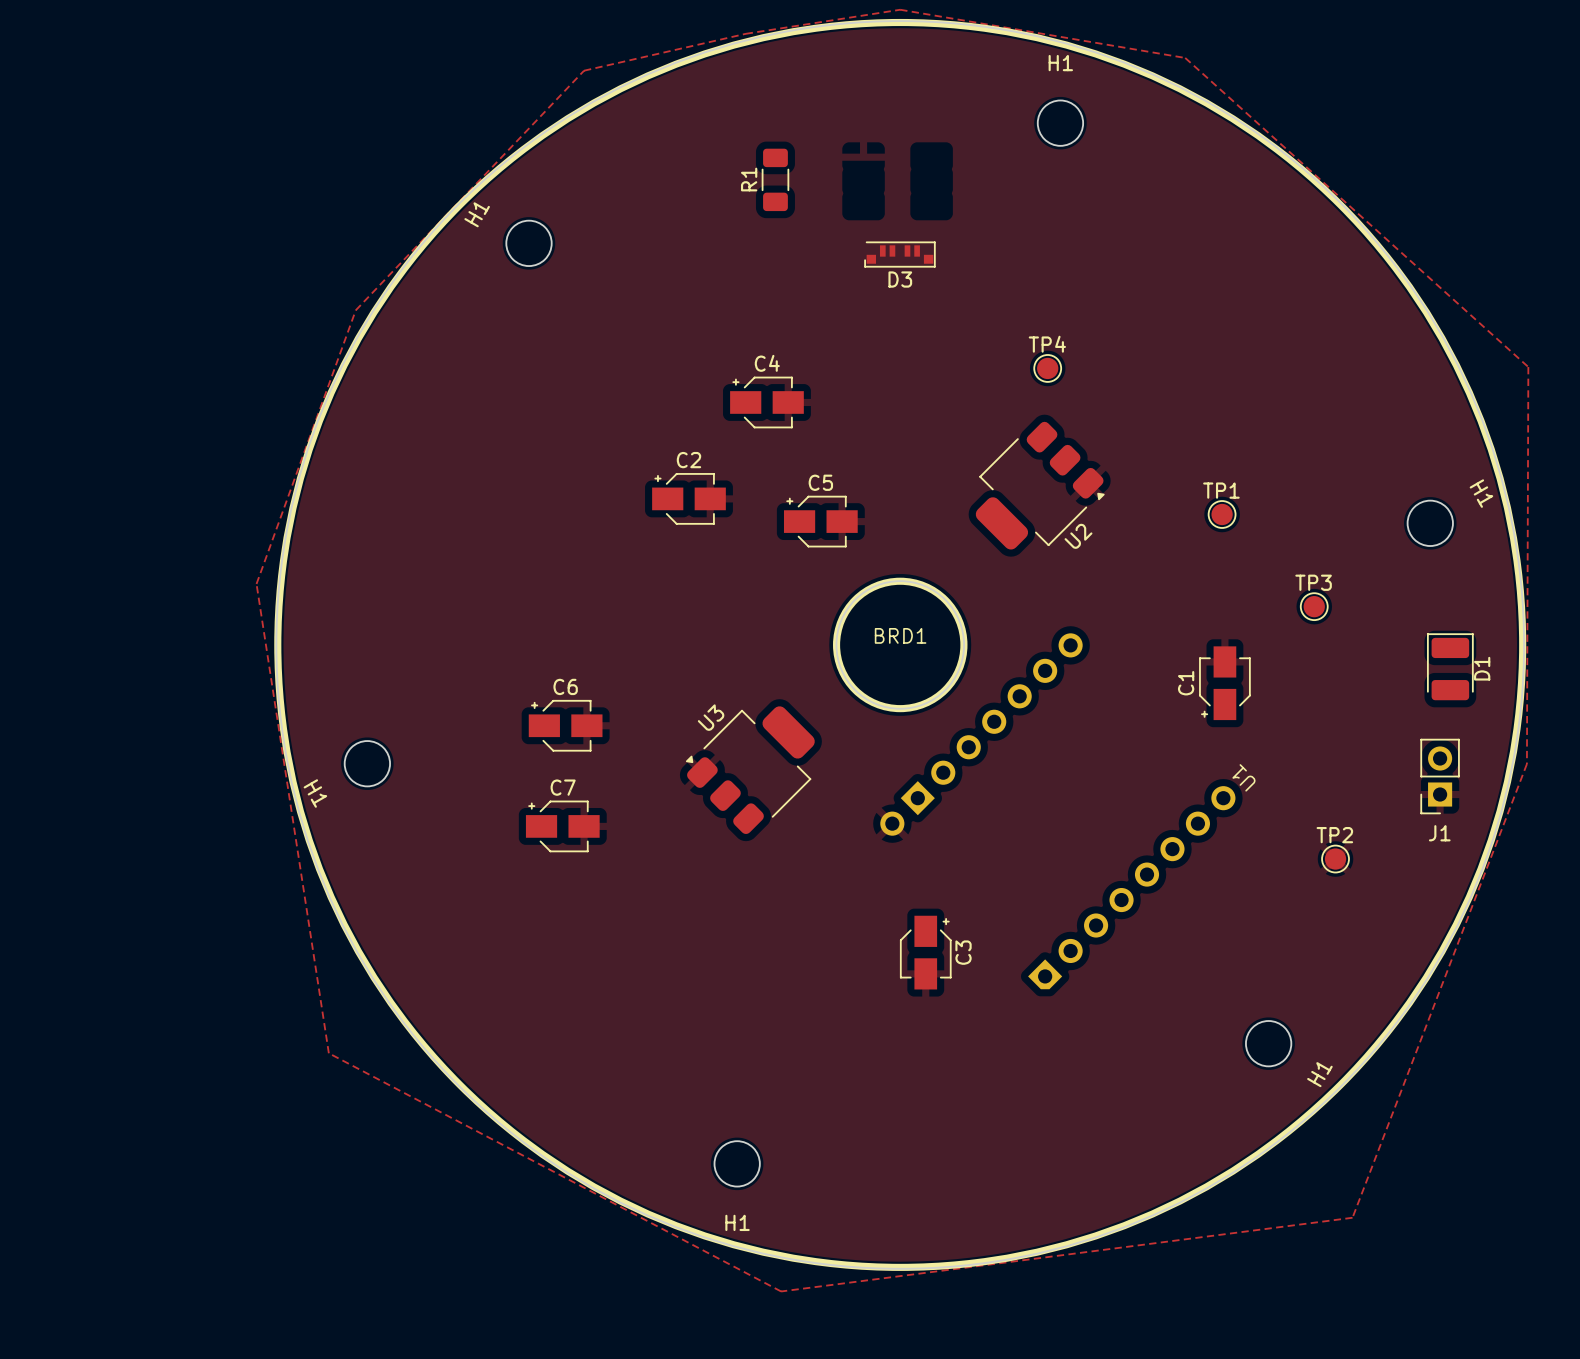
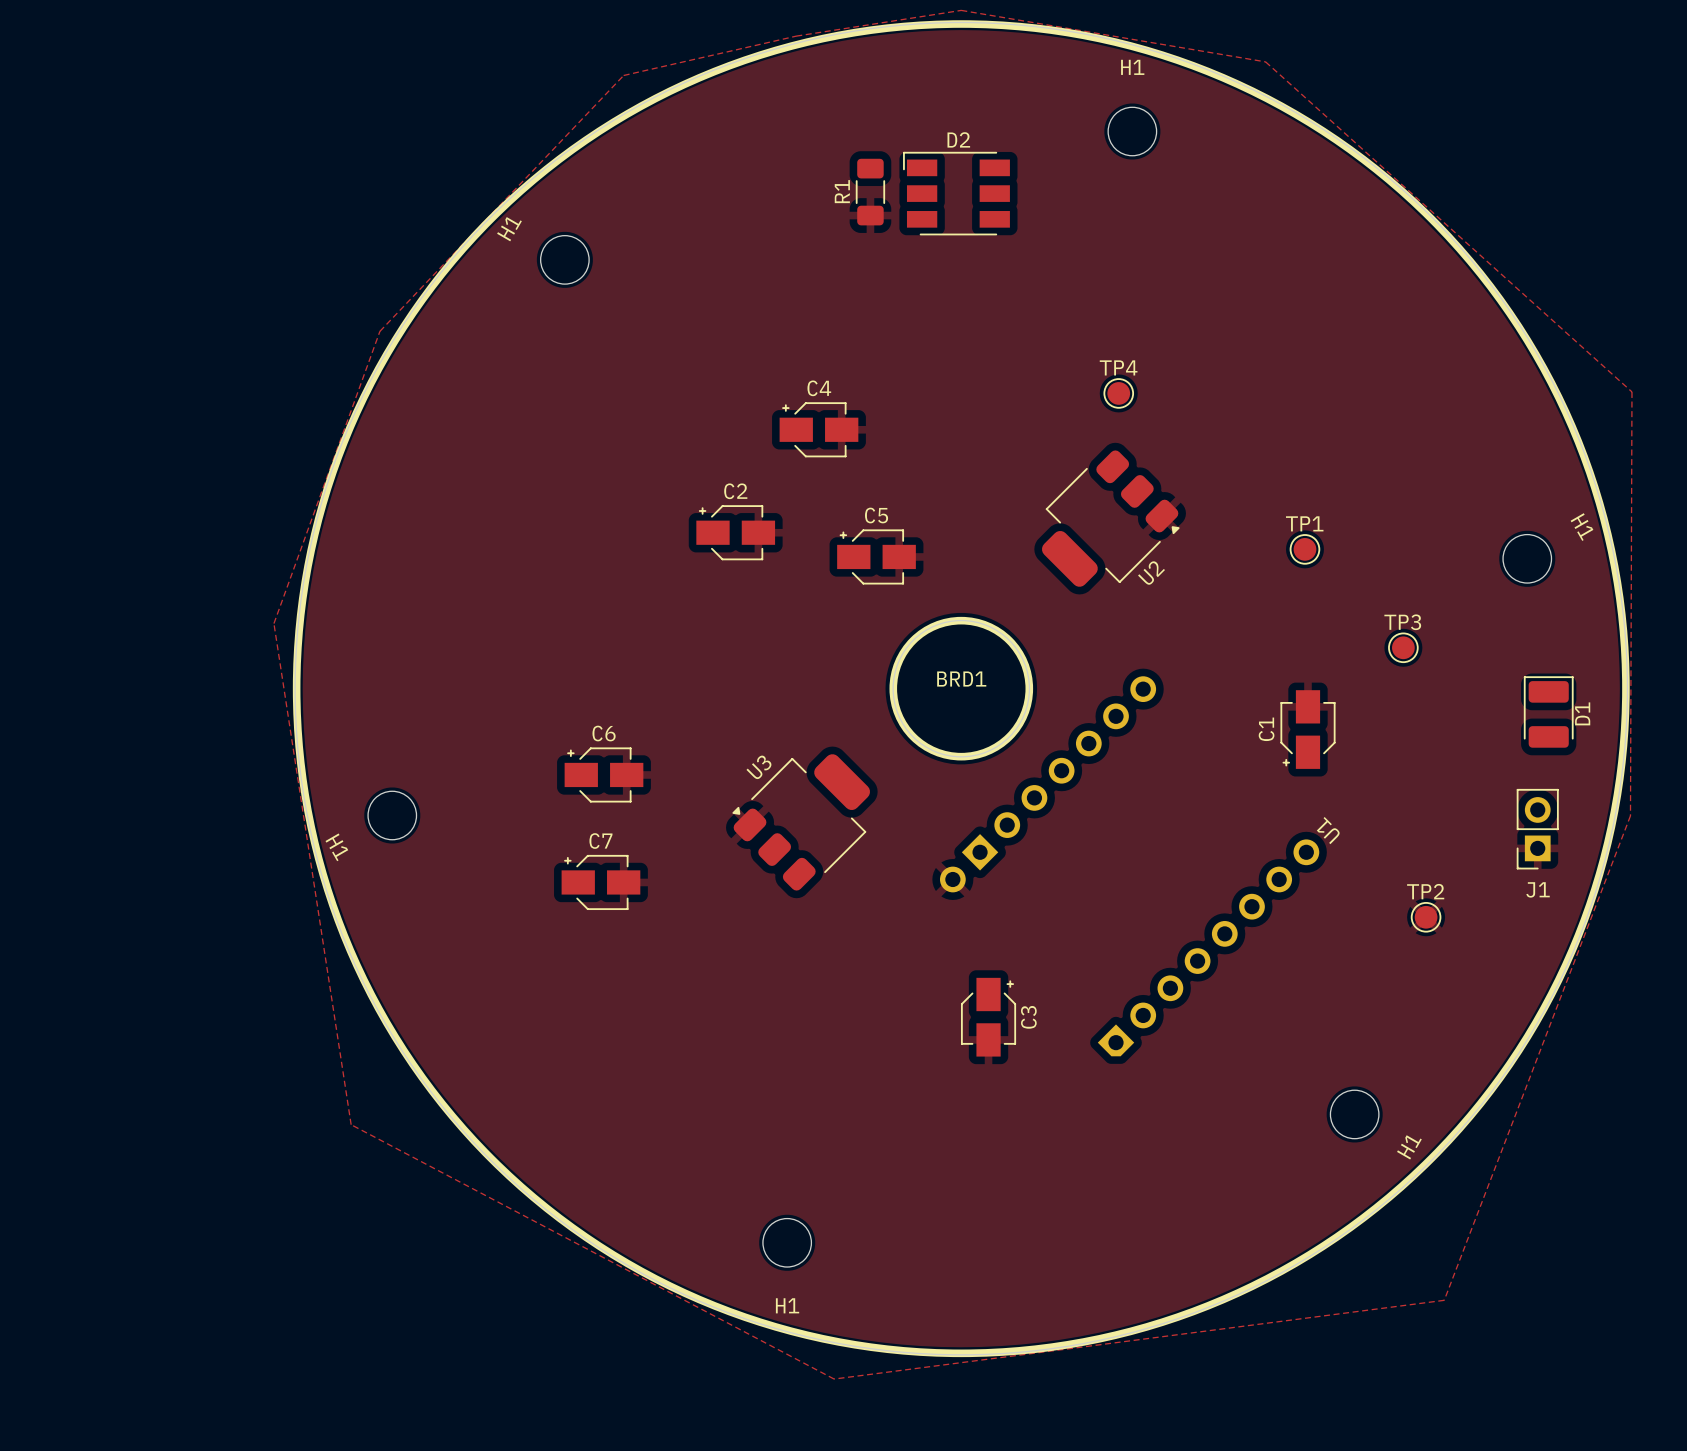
R1 position: (775, 179) -> (870, 192)
D2: none -> (956, 193)
D3: (899, 254) -> none

